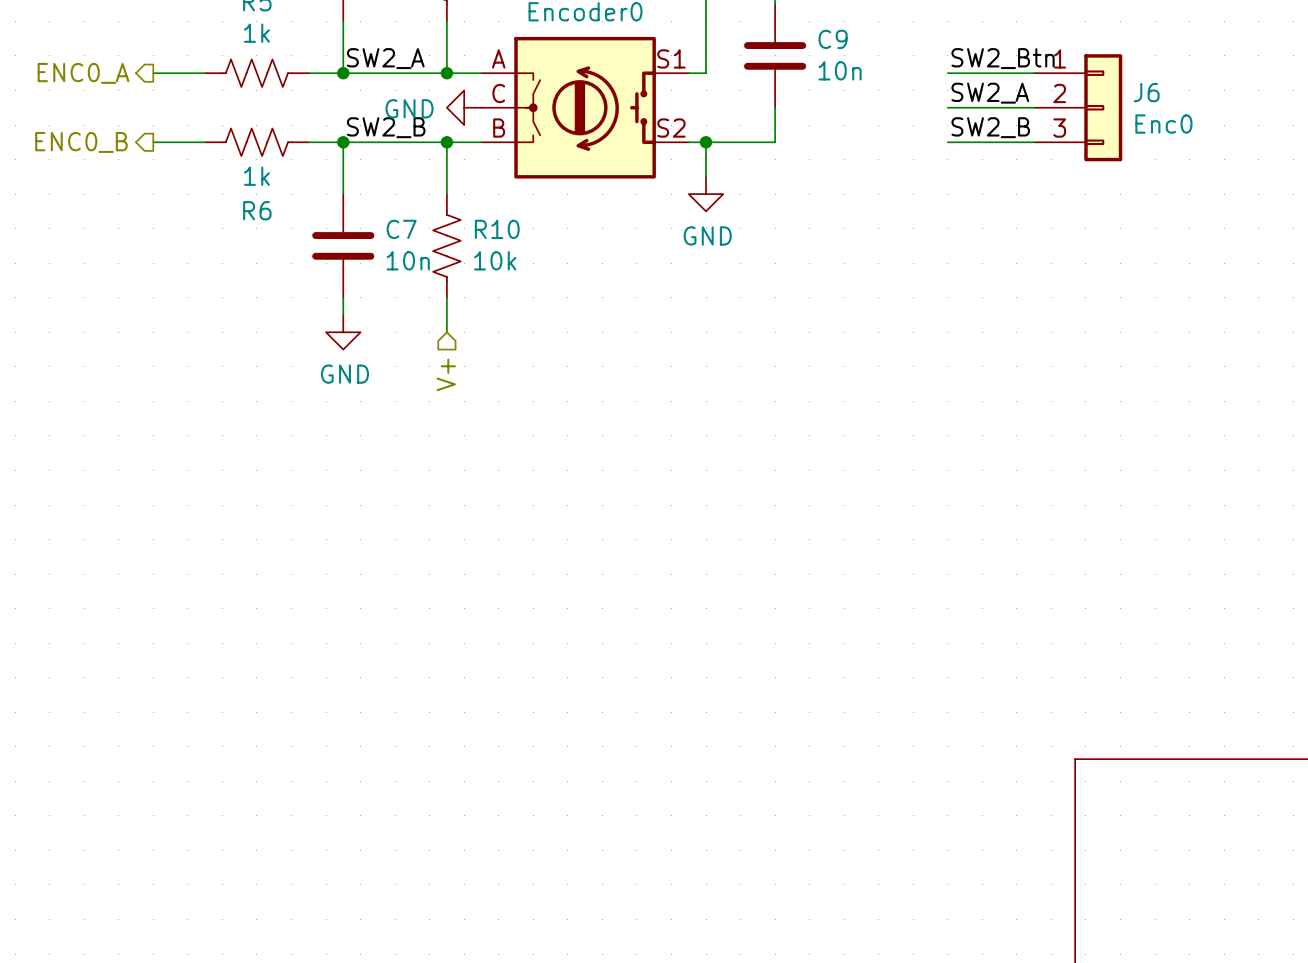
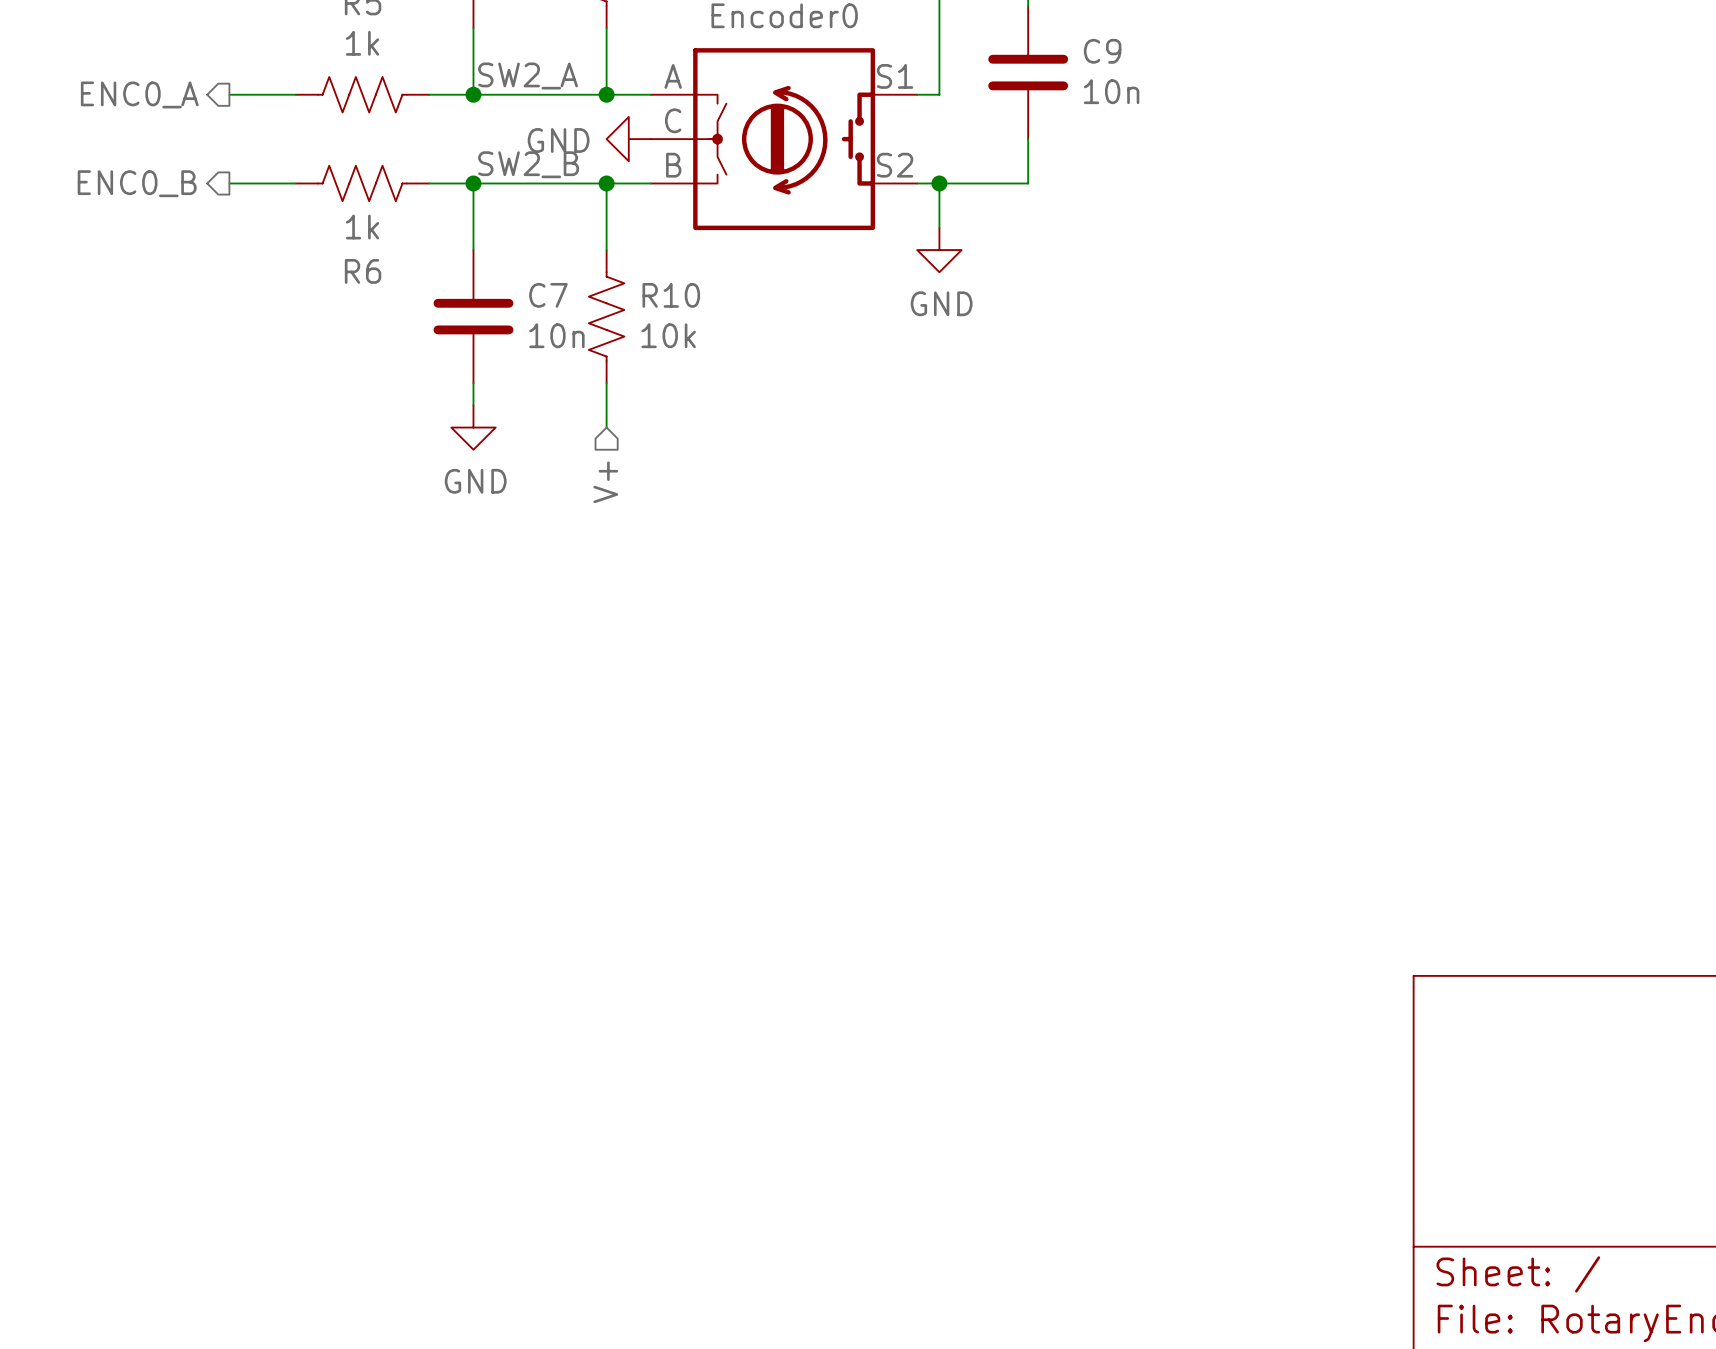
label: SW2_Btn (1003, 58) -> none
wire: (947, 73) (1034, 73) -> none
label: SW2_A (990, 93) -> none
wire: (947, 107) (1034, 107) -> none
J6: Enc0 (1078, 107) -> none
label: SW2_B (990, 127) -> none
wire: (947, 142) (1034, 142) -> none

